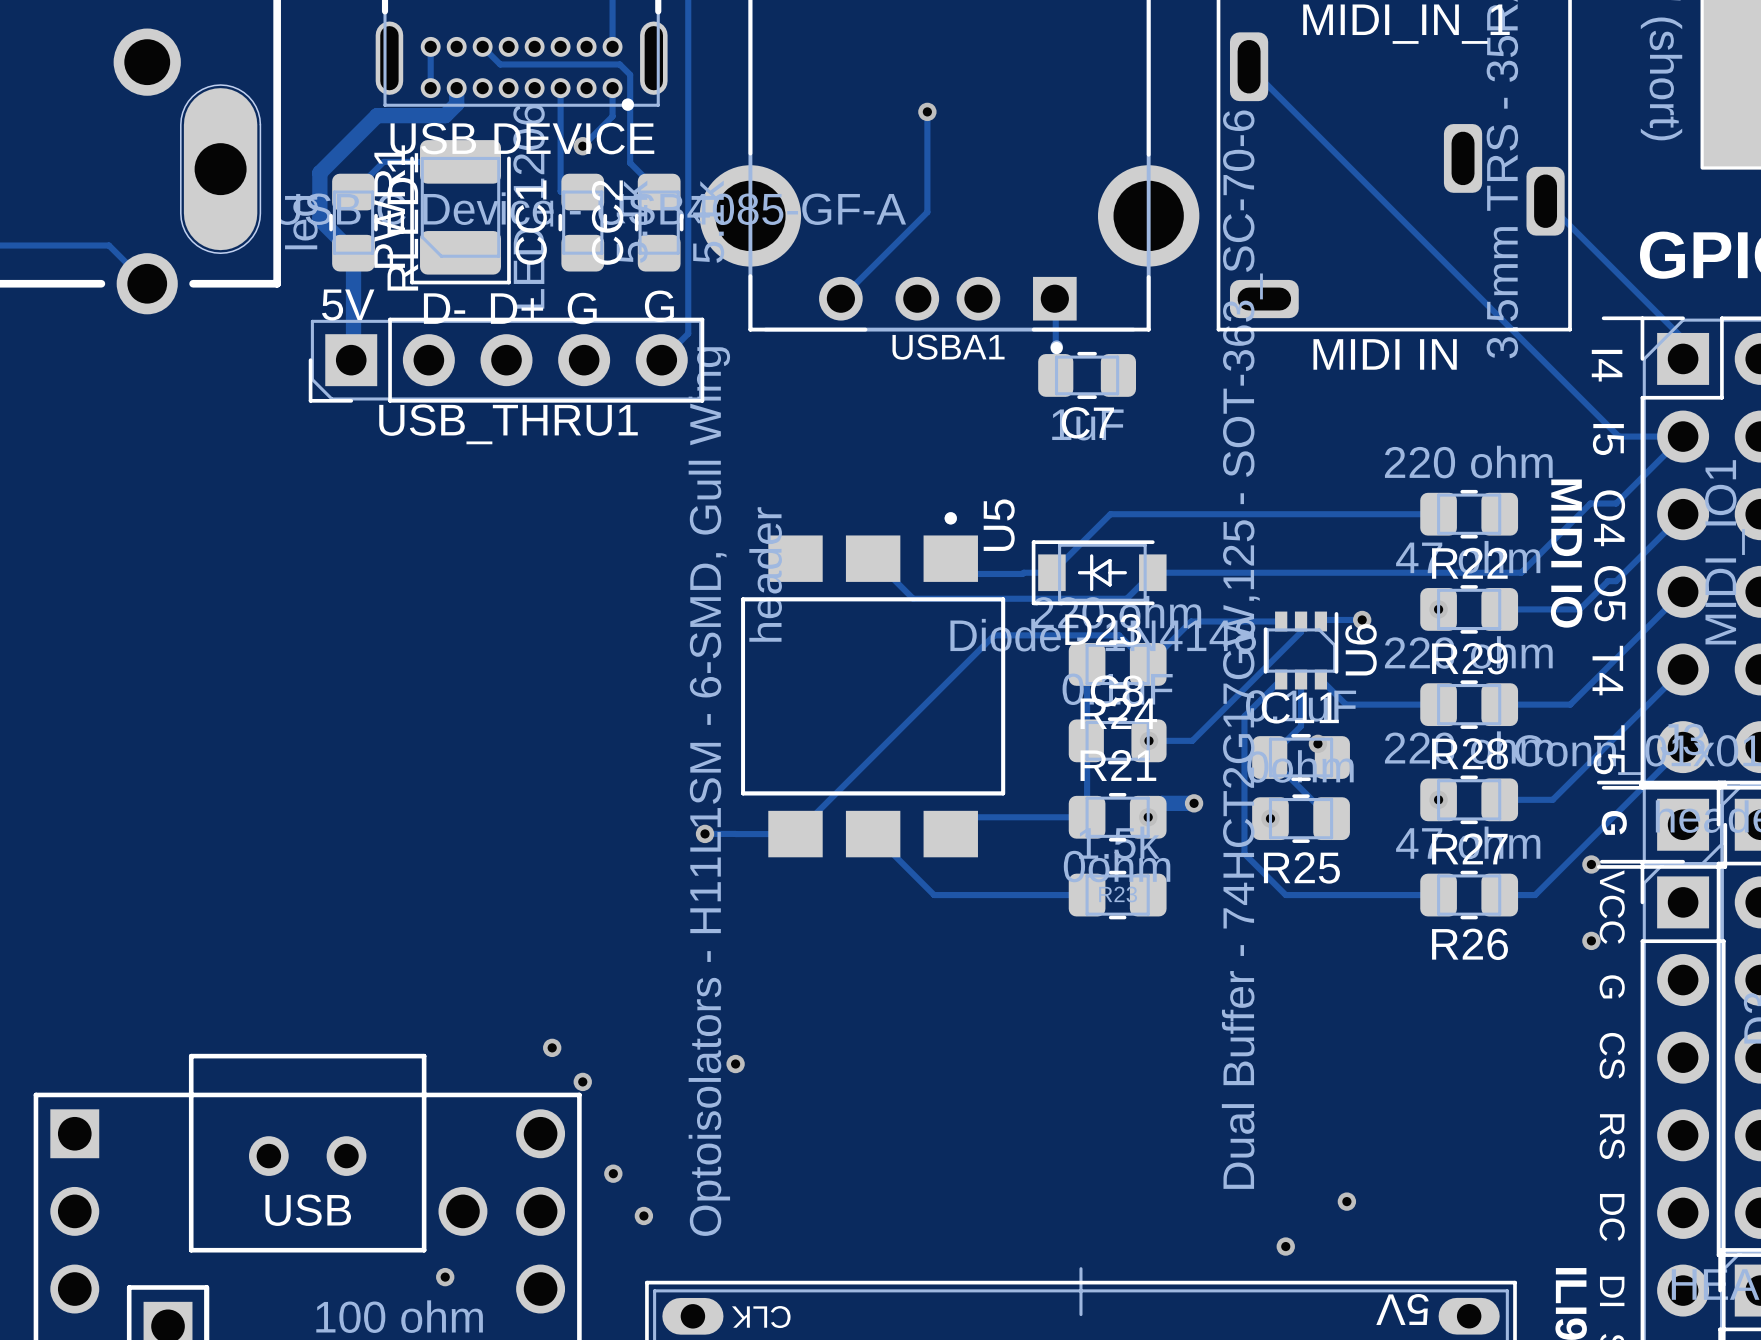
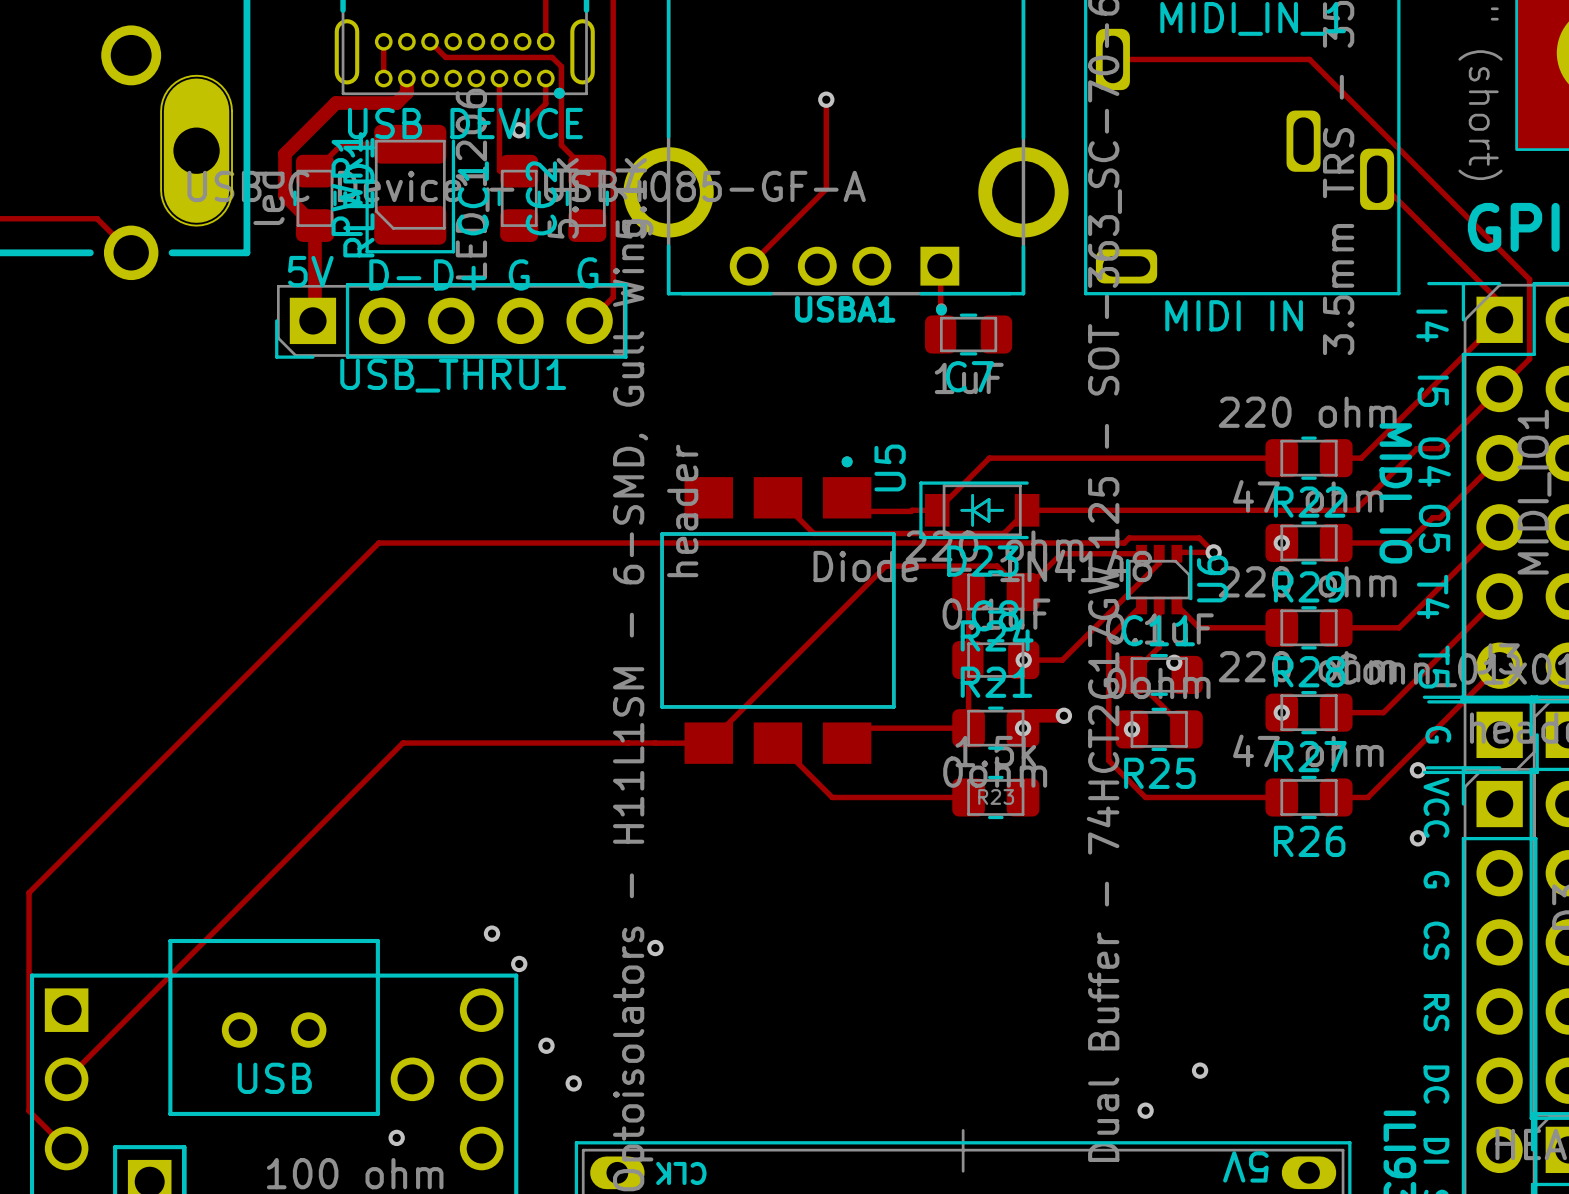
track: (1249, 66) (1618, 436) (1683, 436) -> (1112, 59) (1309, 59) (1529, 279) (1529, 359) (1499, 388)
track: none -> (1499, 319) (1361, 458) (1336, 458)
track: none -> (1213, 552) (1199, 538) (1129, 538) (1124, 543) (378, 543) (29, 892) (29, 1110) (66, 1148)
track: none -> (628, 743) (402, 743) (66, 1079)
via: (705, 833) -> none

